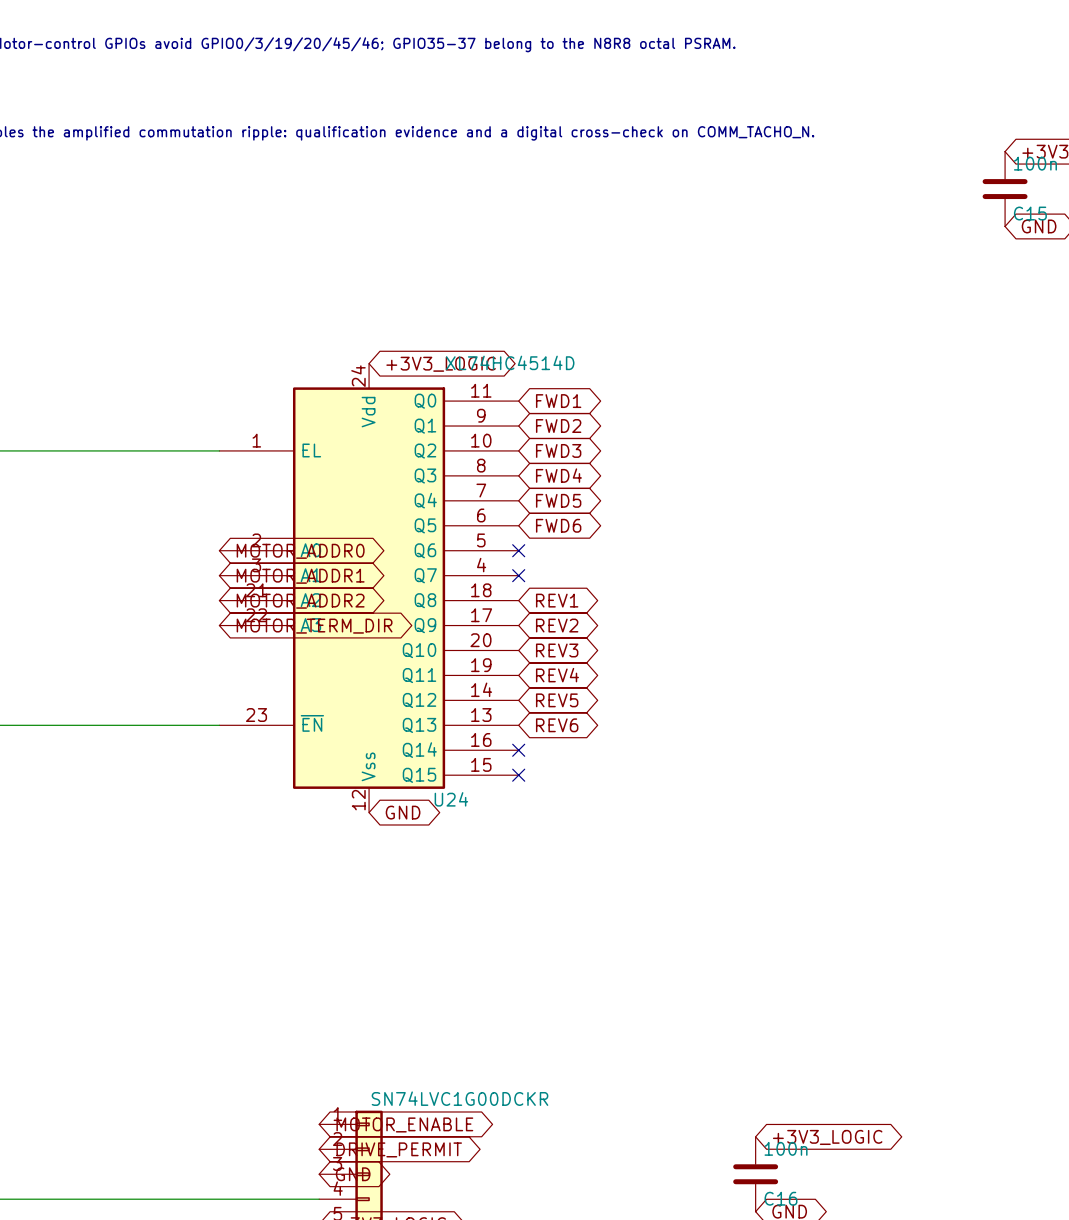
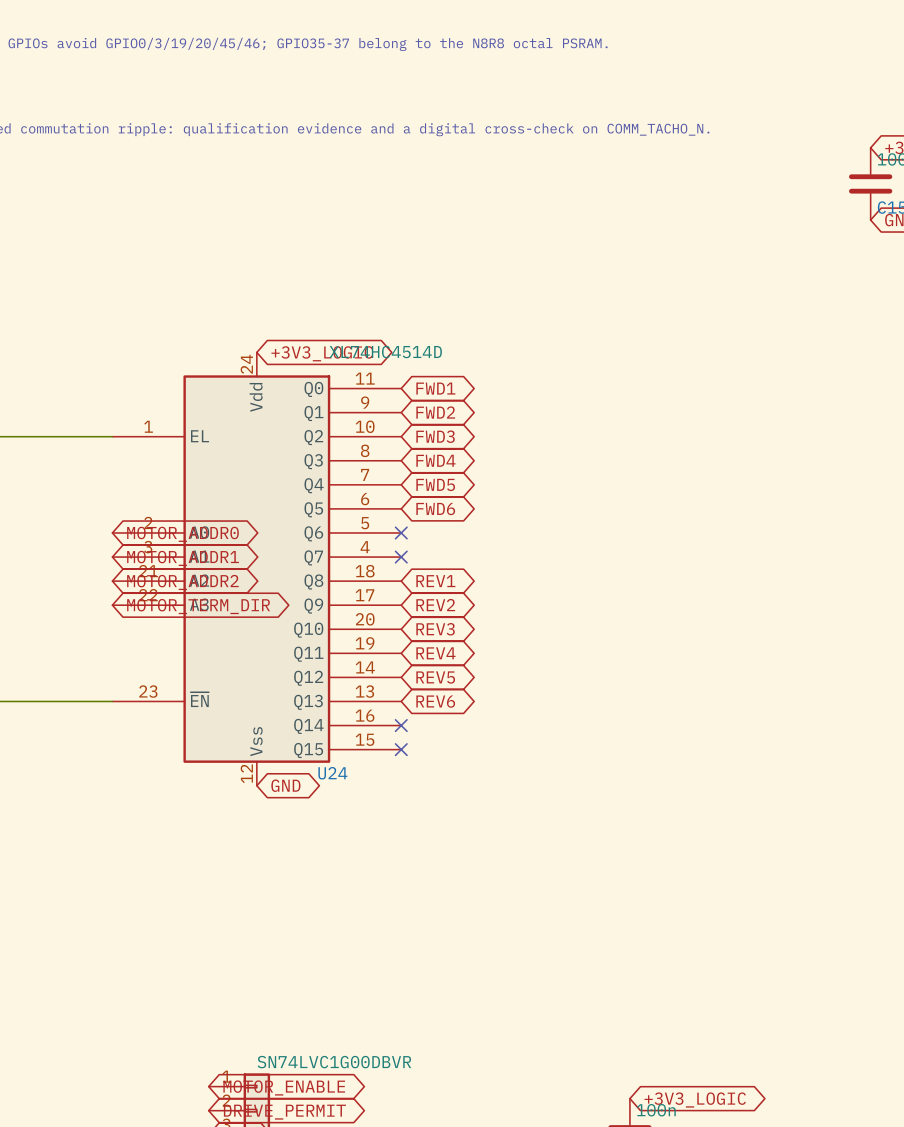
part value: SN74LVC1G00DCKR (460, 1098) -> SN74LVC1G00DBVR (334, 1062)

